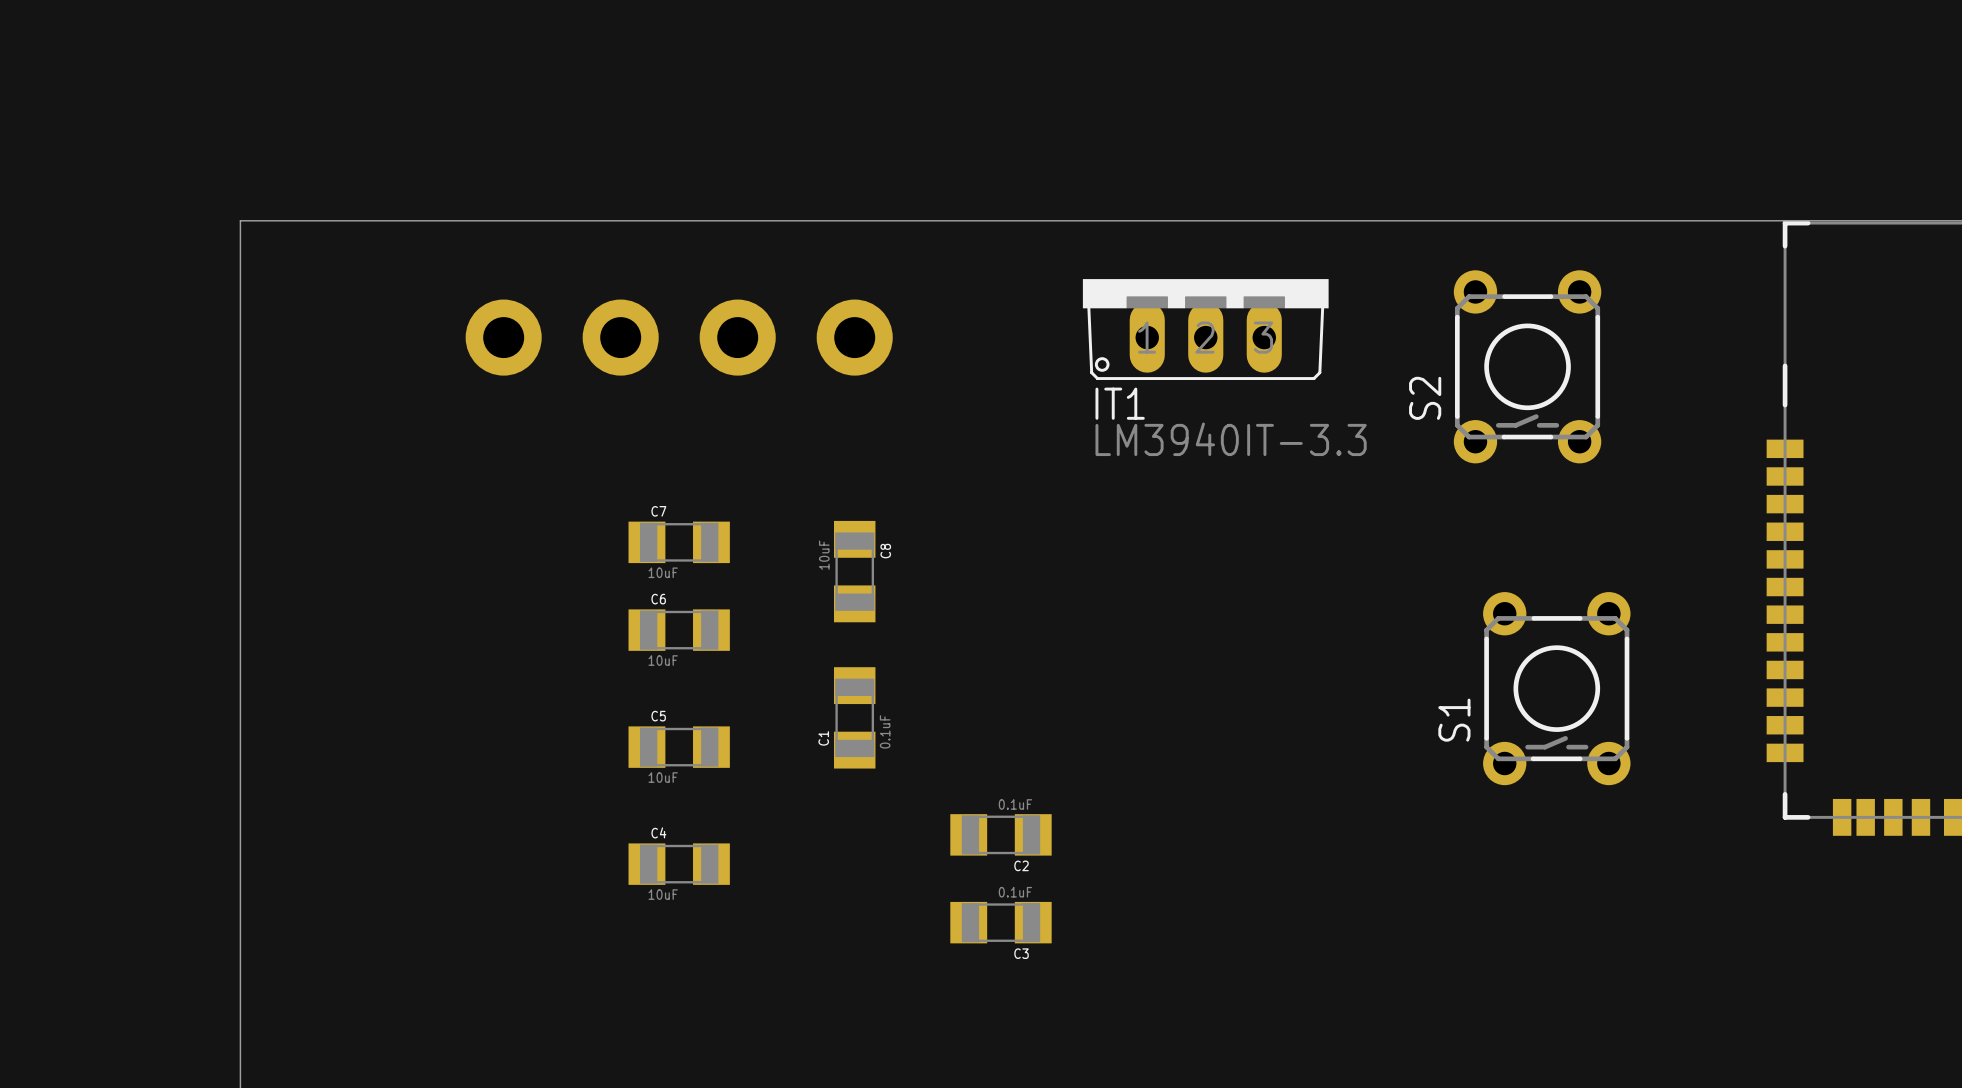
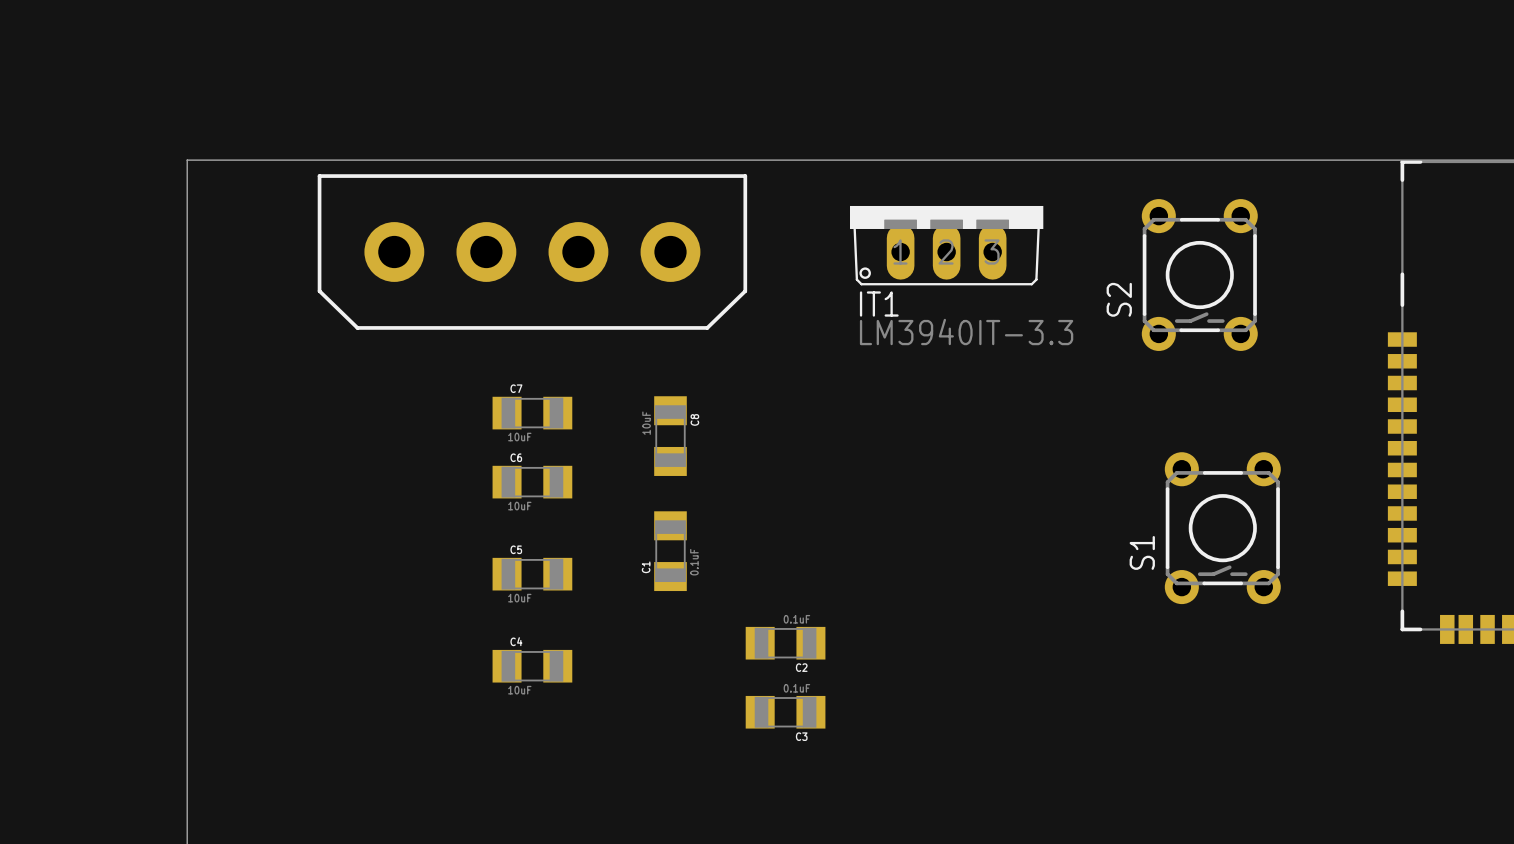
part side: bottom (679, 337) -> top (532, 252)

